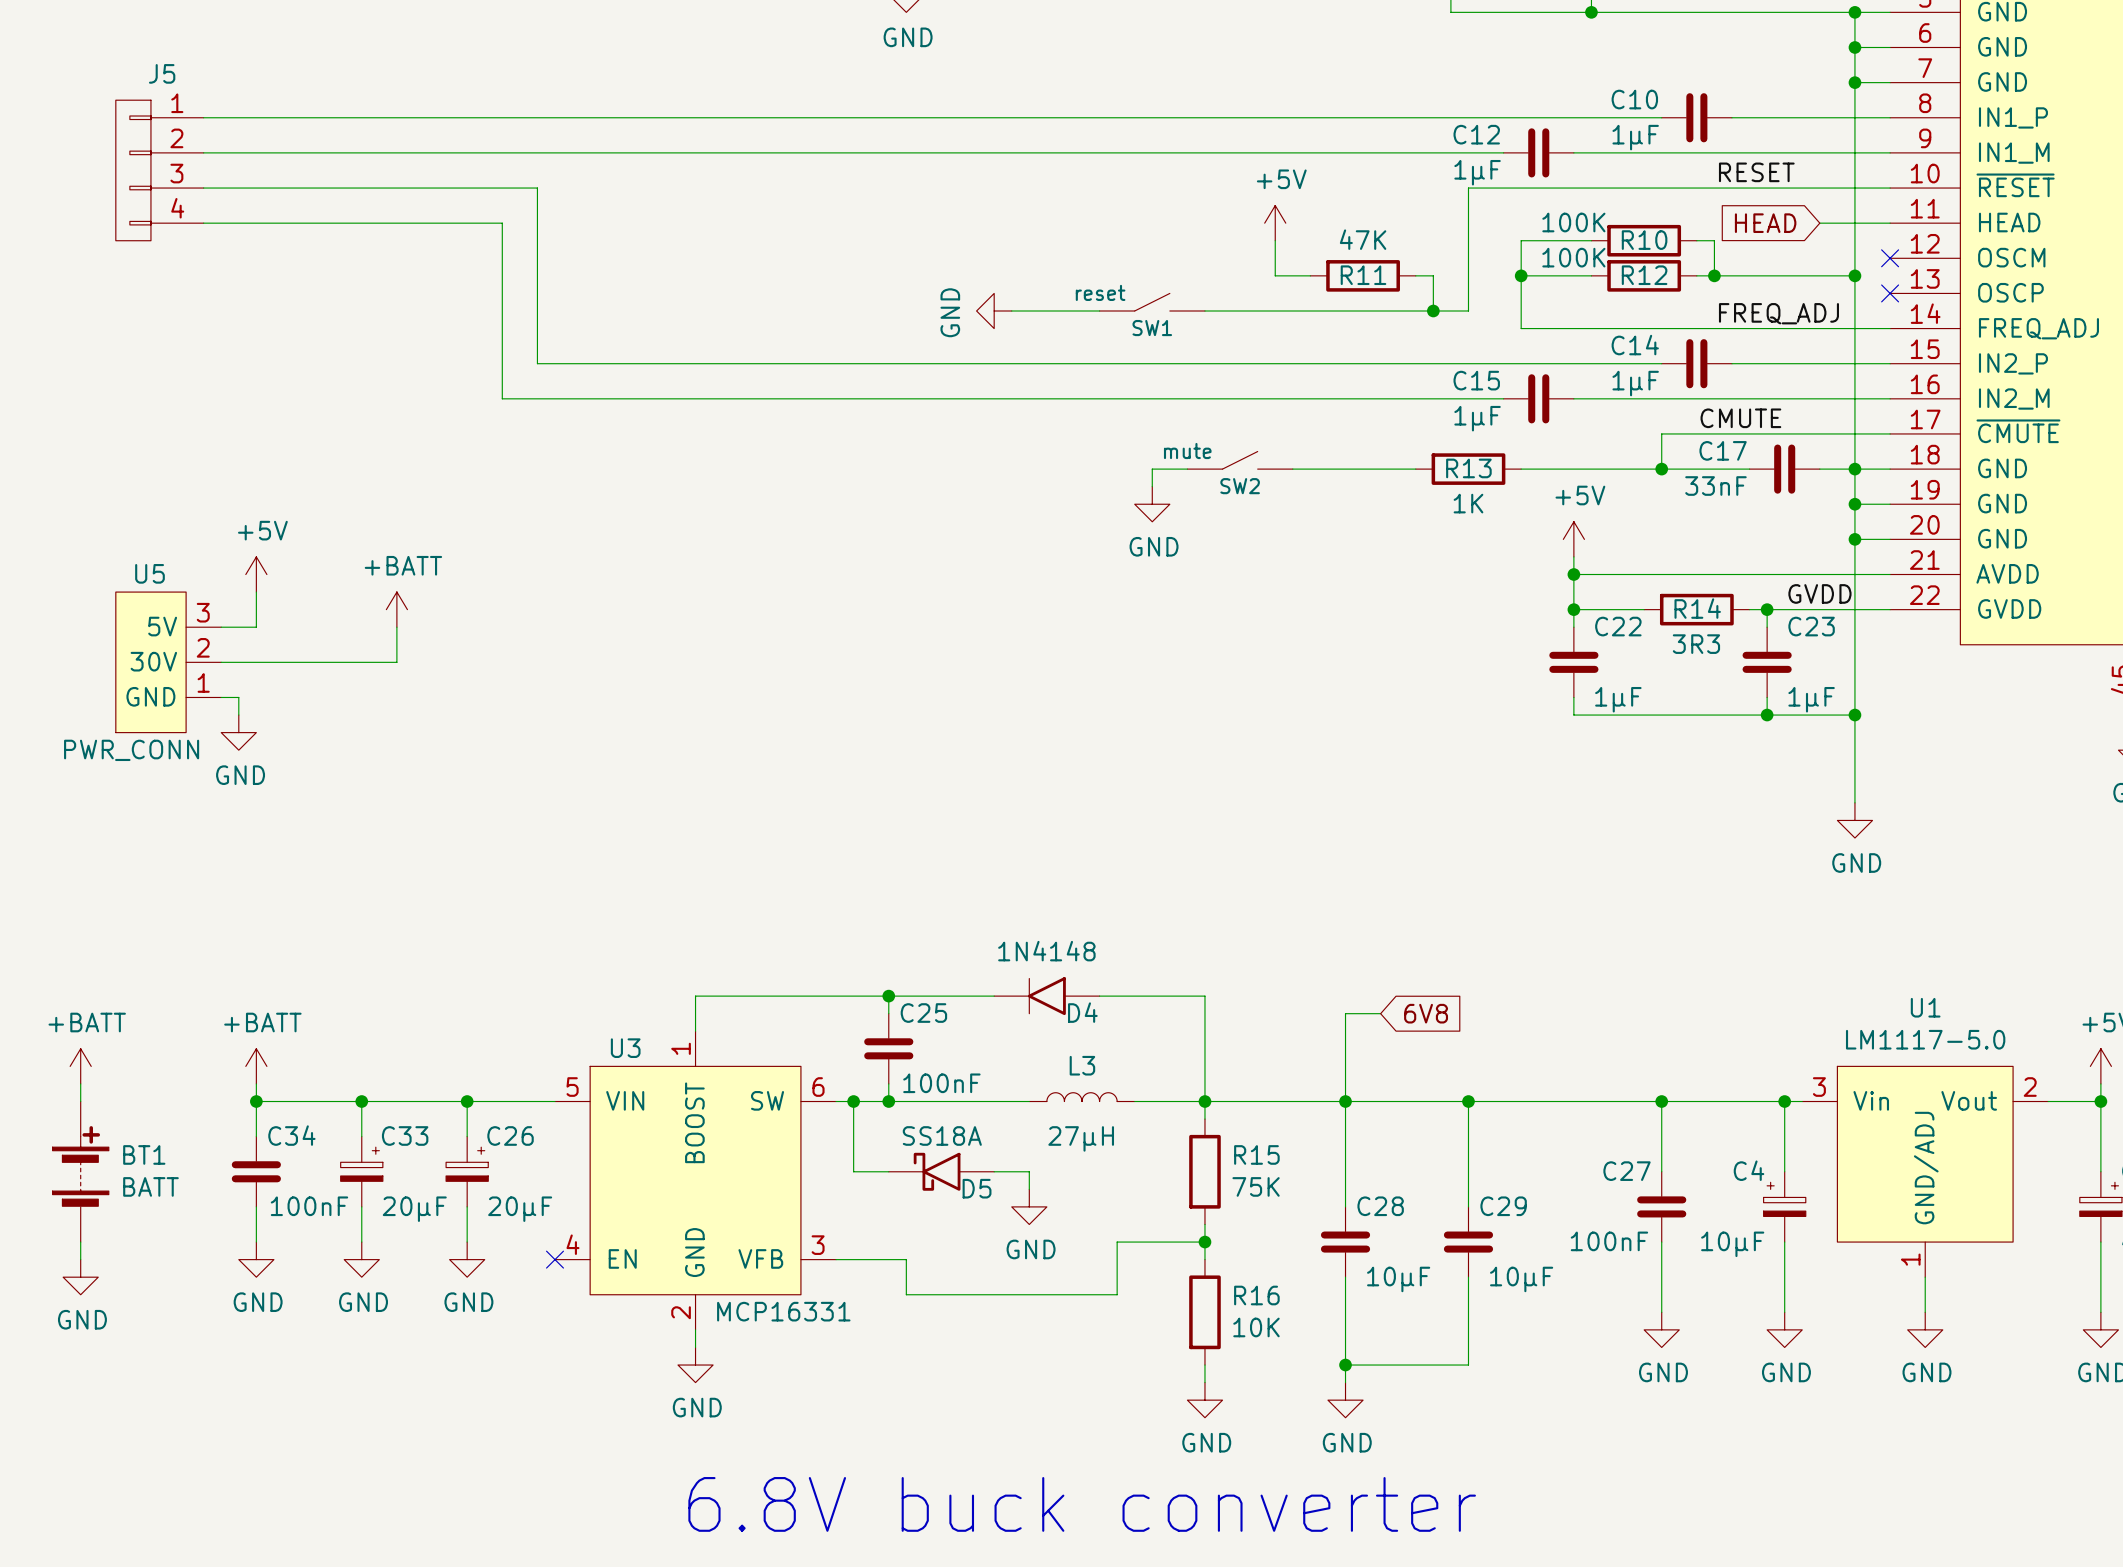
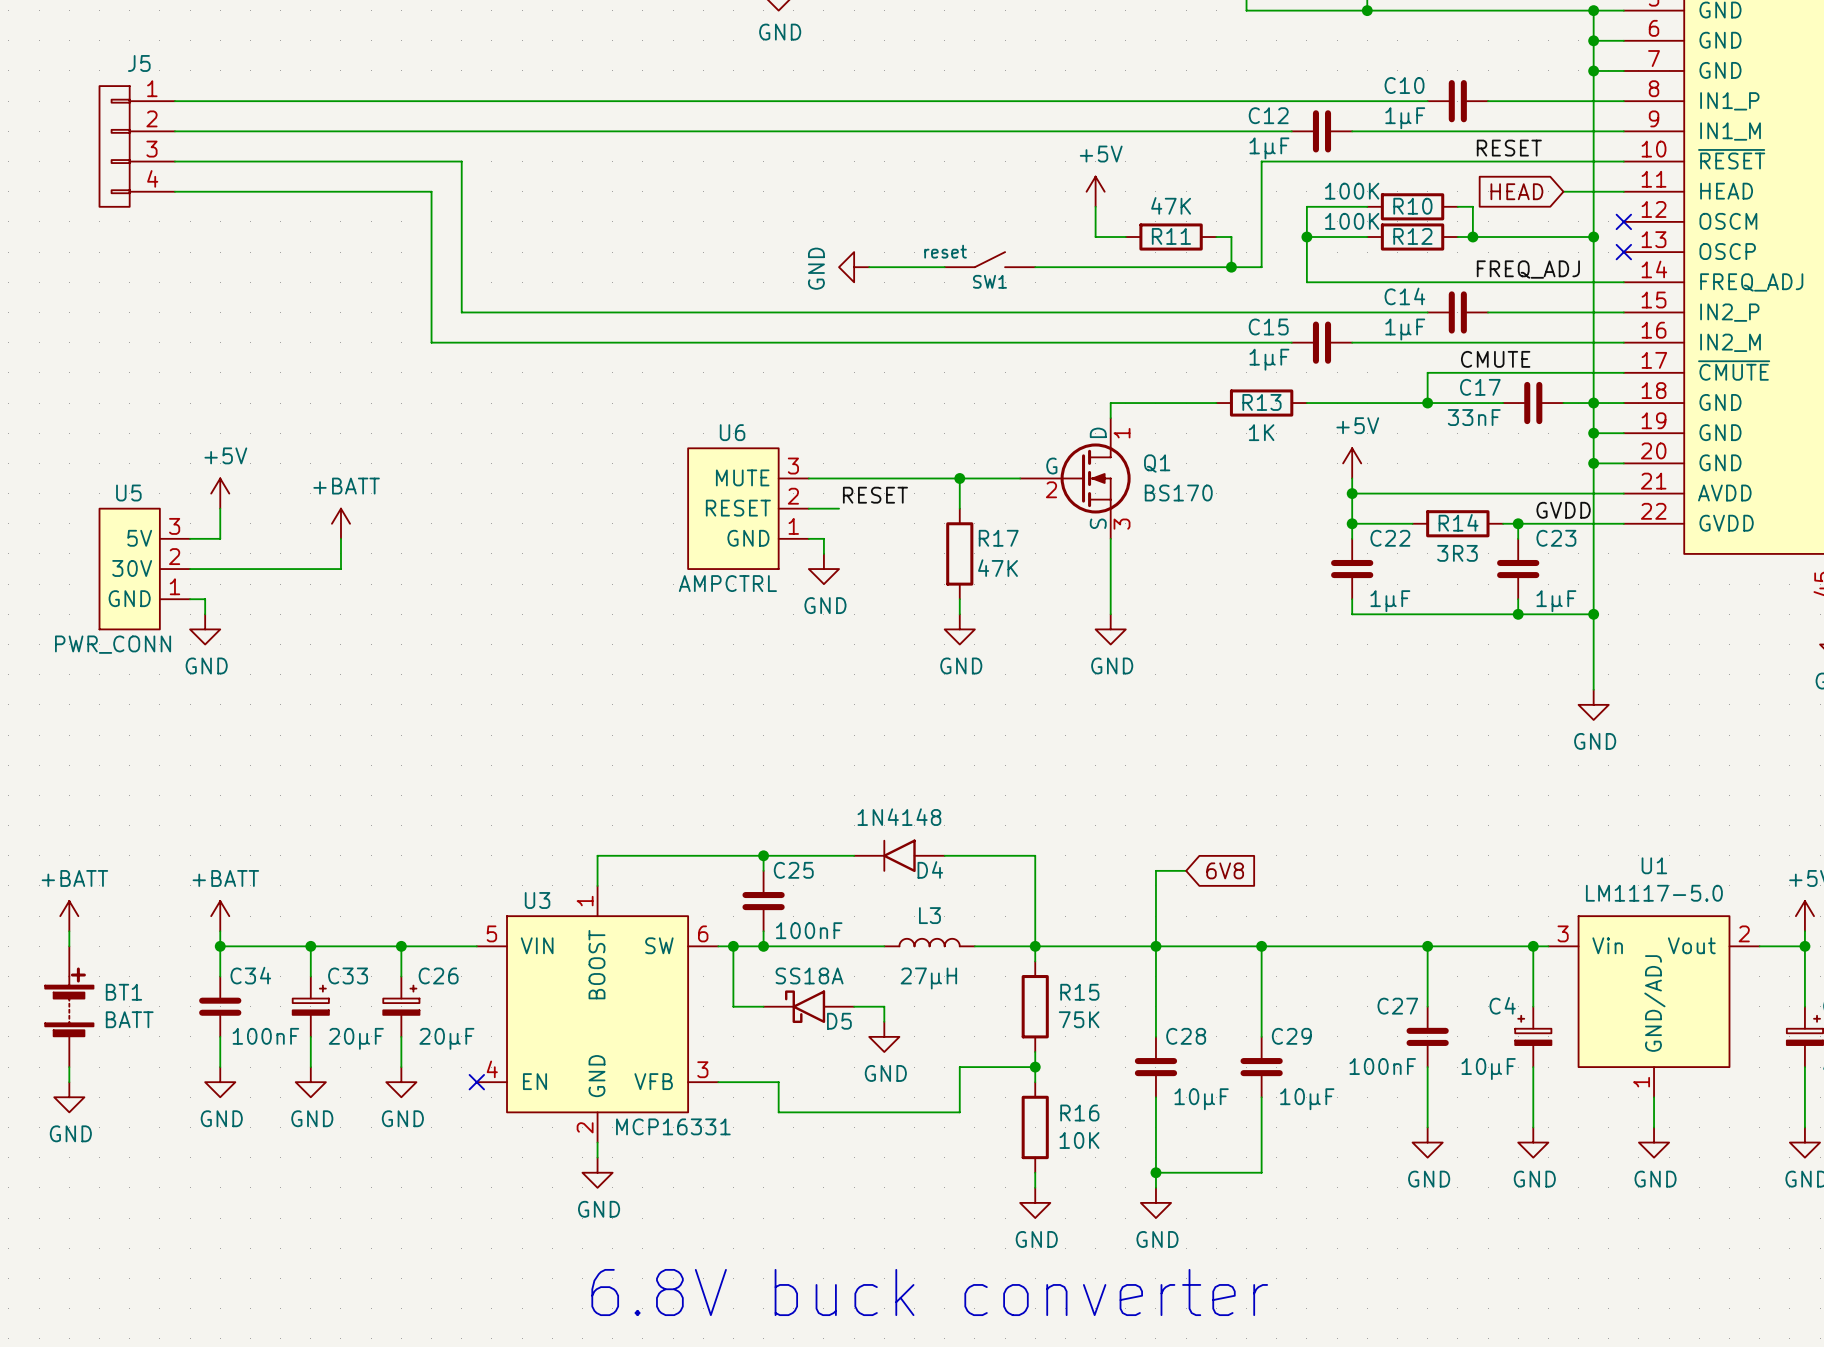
SW2: mute (1240, 460) -> none
wire: (1187, 469) (1152, 469) (1152, 486) -> none
wire: none -> (1110, 403) (1110, 418)
power symbol: GND (1152, 504) -> none
wire: none -> (808, 478) (1020, 478)
wire: none -> (959, 478) (959, 508)
junction: none -> (959, 478)
Q1: none -> BS170 (1075, 478)
label: none -> RESET (875, 495)
U6: none -> AMPCTRL (748, 508)
wire: none -> (808, 508) (839, 508)
wire: none -> (808, 538) (823, 538) (823, 553)
wire: none -> (1110, 538) (1110, 614)
R17: none -> 47K (959, 553)
power symbol: none -> GND (823, 569)
wire: none -> (959, 599) (959, 614)
power symbol: none -> GND (959, 629)
power symbol: none -> GND (1110, 629)

